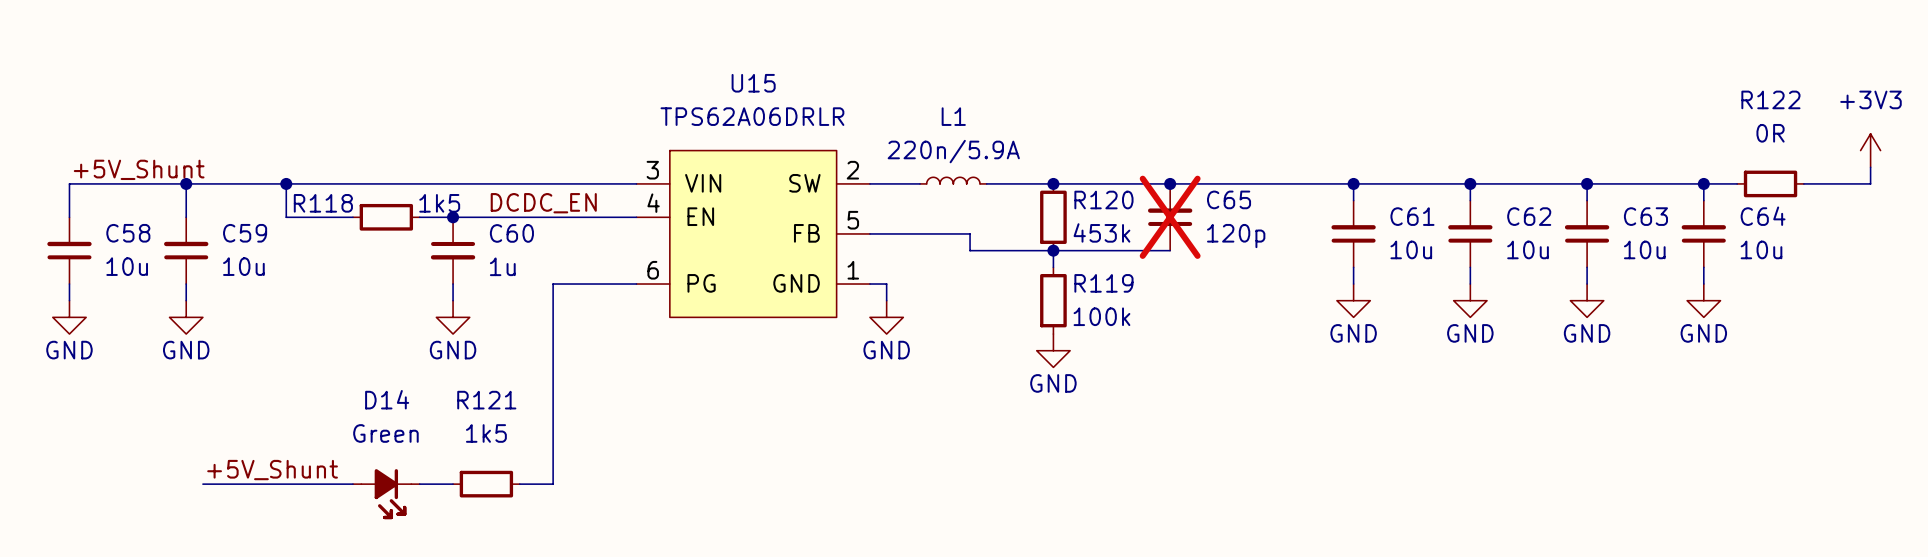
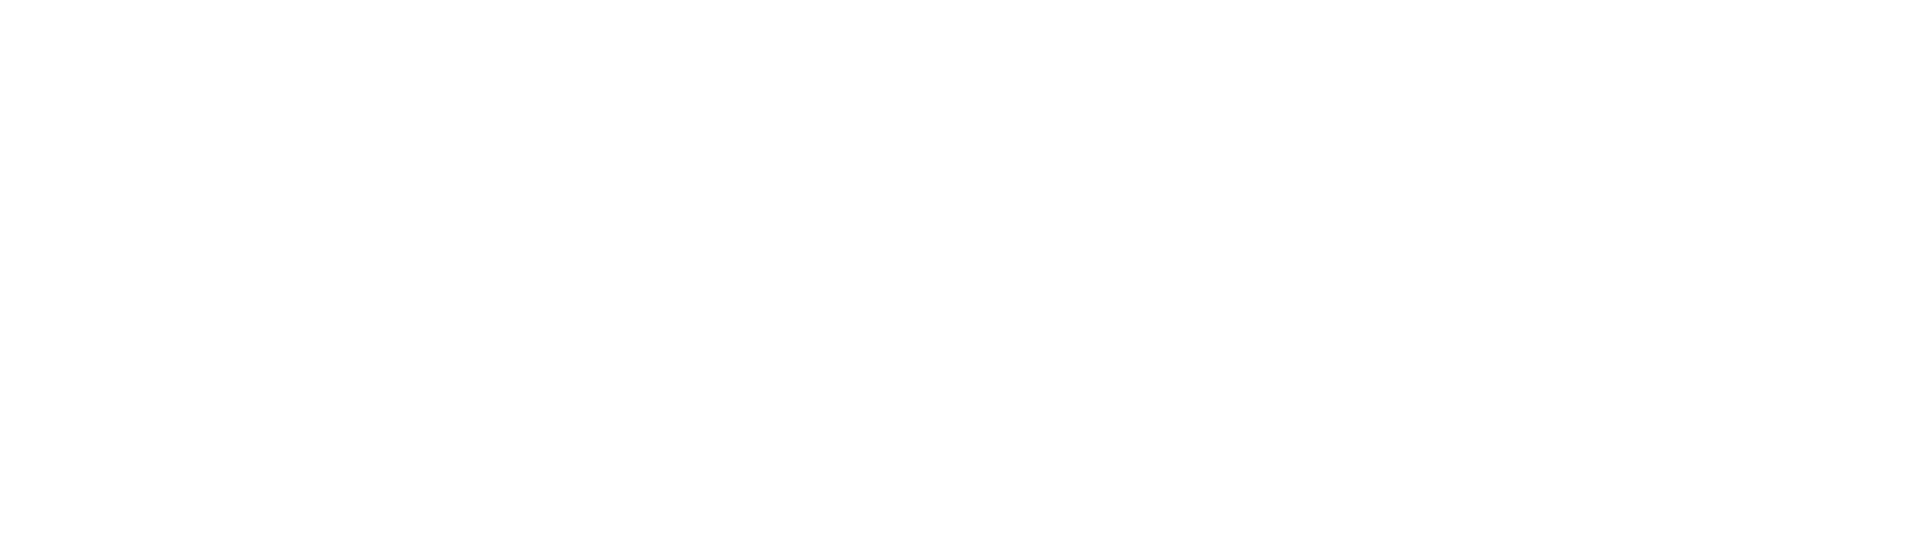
power symbol: +3V3 (1870, 150) -> none
wire: (1870, 167) (1870, 183) (1803, 183) -> none
label: +5V_Shunt (139, 169) -> none
L1: (953, 180) -> none
wire: (186, 183) (186, 217) -> none
junction: (186, 183) -> none
wire: (286, 183) (286, 217) (352, 217) -> none
junction: (286, 183) -> none
wire: (636, 183) (69, 183) (69, 217) -> none
wire: (869, 183) (920, 183) -> none
wire: (986, 183) (1737, 183) -> none
junction: (1053, 183) -> none
junction: (1170, 183) -> none
wire: (1353, 183) (1353, 200) -> none
junction: (1353, 183) -> none
wire: (1470, 183) (1470, 200) -> none
junction: (1470, 183) -> none
wire: (1587, 183) (1587, 200) -> none
junction: (1587, 183) -> none
wire: (1703, 183) (1703, 200) -> none
junction: (1703, 183) -> none
R122: (1770, 183) -> none
label: DCDC_EN (543, 203) -> none
R118: (386, 217) -> none
wire: (419, 217) (636, 217) -> none
junction: (453, 217) -> none
R120: (1053, 217) -> none
C65: (1170, 217) -> none
U15: (753, 233) -> none
wire: (869, 233) (970, 233) (970, 250) (1170, 250) -> none
C61: (1353, 233) -> none
C62: (1470, 233) -> none
C63: (1587, 233) -> none
C64: (1703, 233) -> none
C58: (69, 250) -> none
C59: (186, 250) -> none
C60: (453, 250) -> none
wire: (1053, 250) (1053, 267) -> none
junction: (1053, 250) -> none
wire: (1353, 267) (1353, 284) -> none
wire: (1470, 267) (1470, 284) -> none
wire: (1587, 267) (1587, 284) -> none
wire: (1703, 267) (1703, 284) -> none
wire: (69, 284) (69, 300) -> none
wire: (186, 284) (186, 300) -> none
wire: (453, 284) (453, 300) -> none
wire: (636, 284) (553, 284) (553, 484) (519, 484) -> none
wire: (869, 284) (886, 284) (886, 300) -> none
R119: (1053, 300) -> none
power symbol: GND (1353, 300) -> none
power symbol: GND (1470, 300) -> none
power symbol: GND (1587, 300) -> none
power symbol: GND (1703, 300) -> none
power symbol: GND (69, 317) -> none
power symbol: GND (186, 317) -> none
power symbol: GND (453, 317) -> none
power symbol: GND (886, 317) -> none
power symbol: GND (1053, 350) -> none
label: +5V_Shunt (272, 470) -> none
wire: (202, 484) (352, 484) -> none
wire: (419, 484) (453, 484) -> none
R121: (486, 484) -> none
D14: (386, 494) -> none

